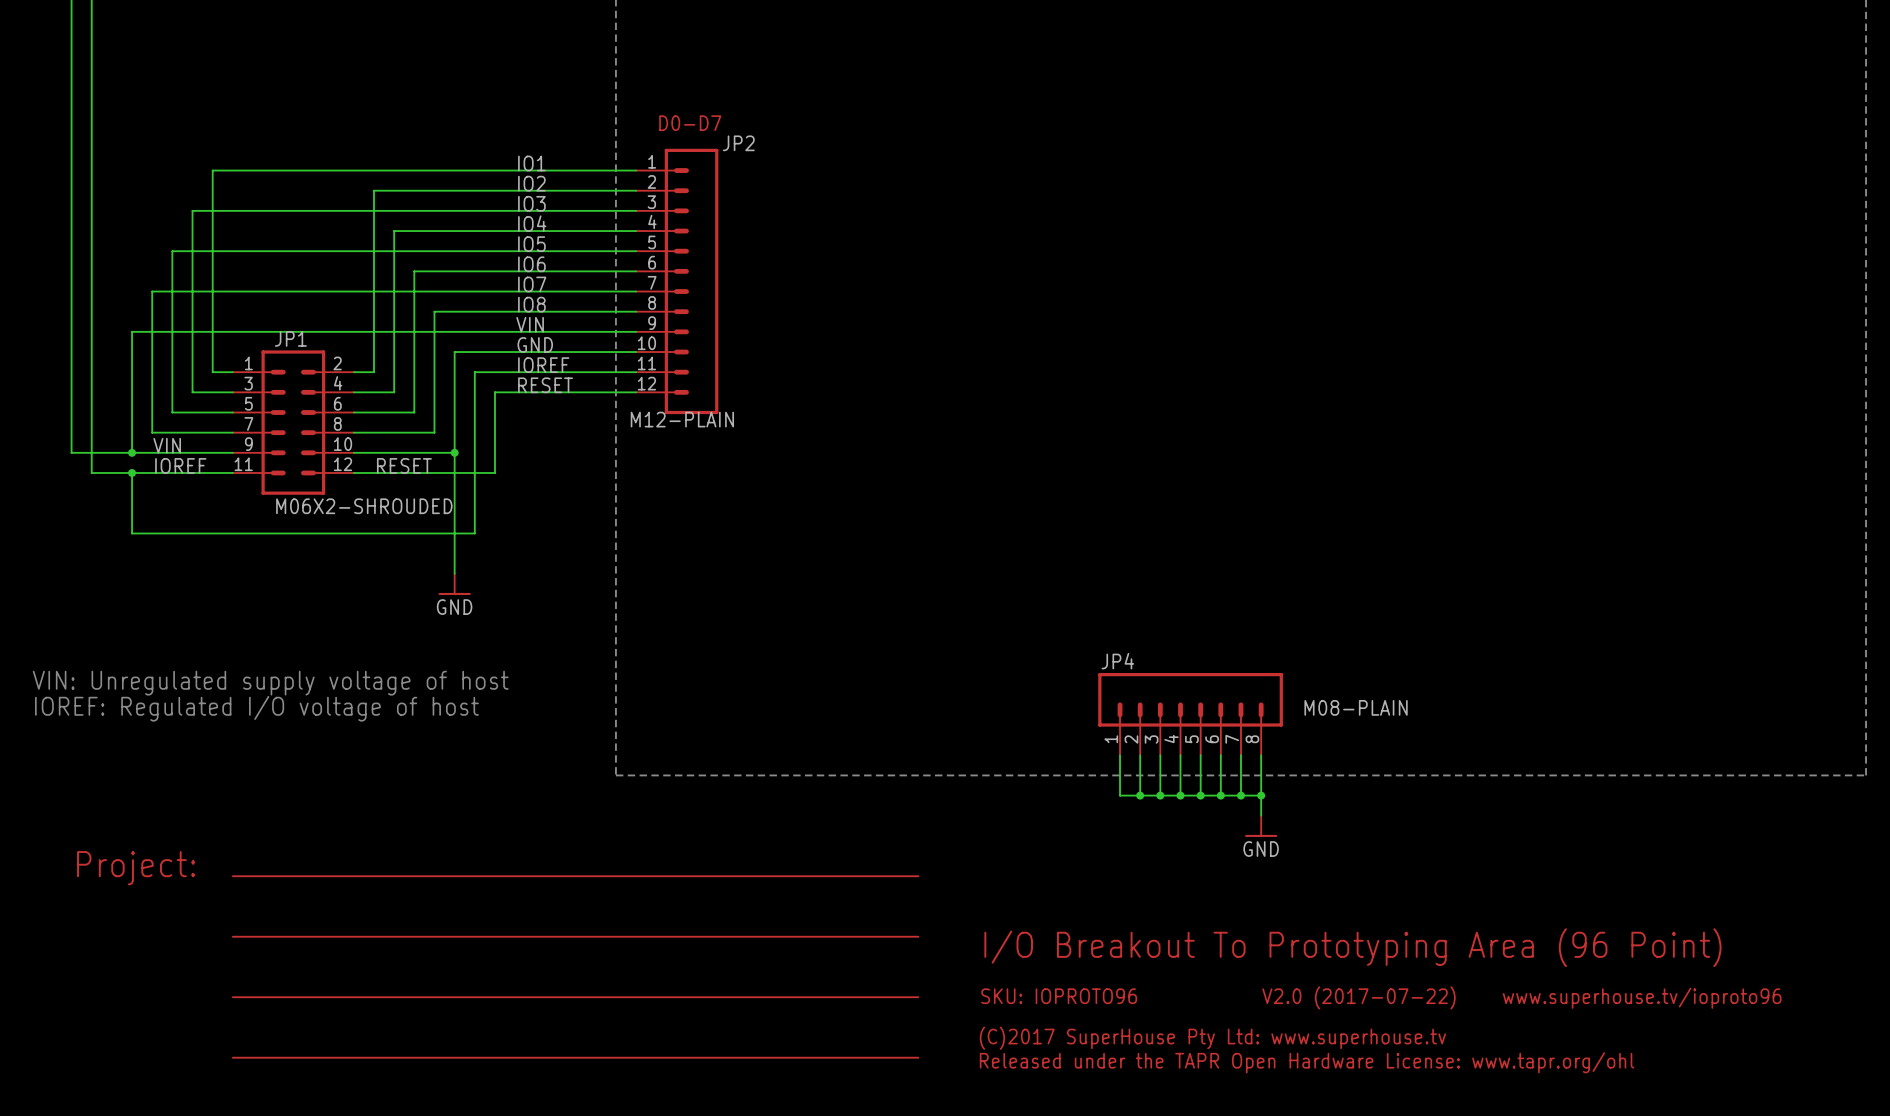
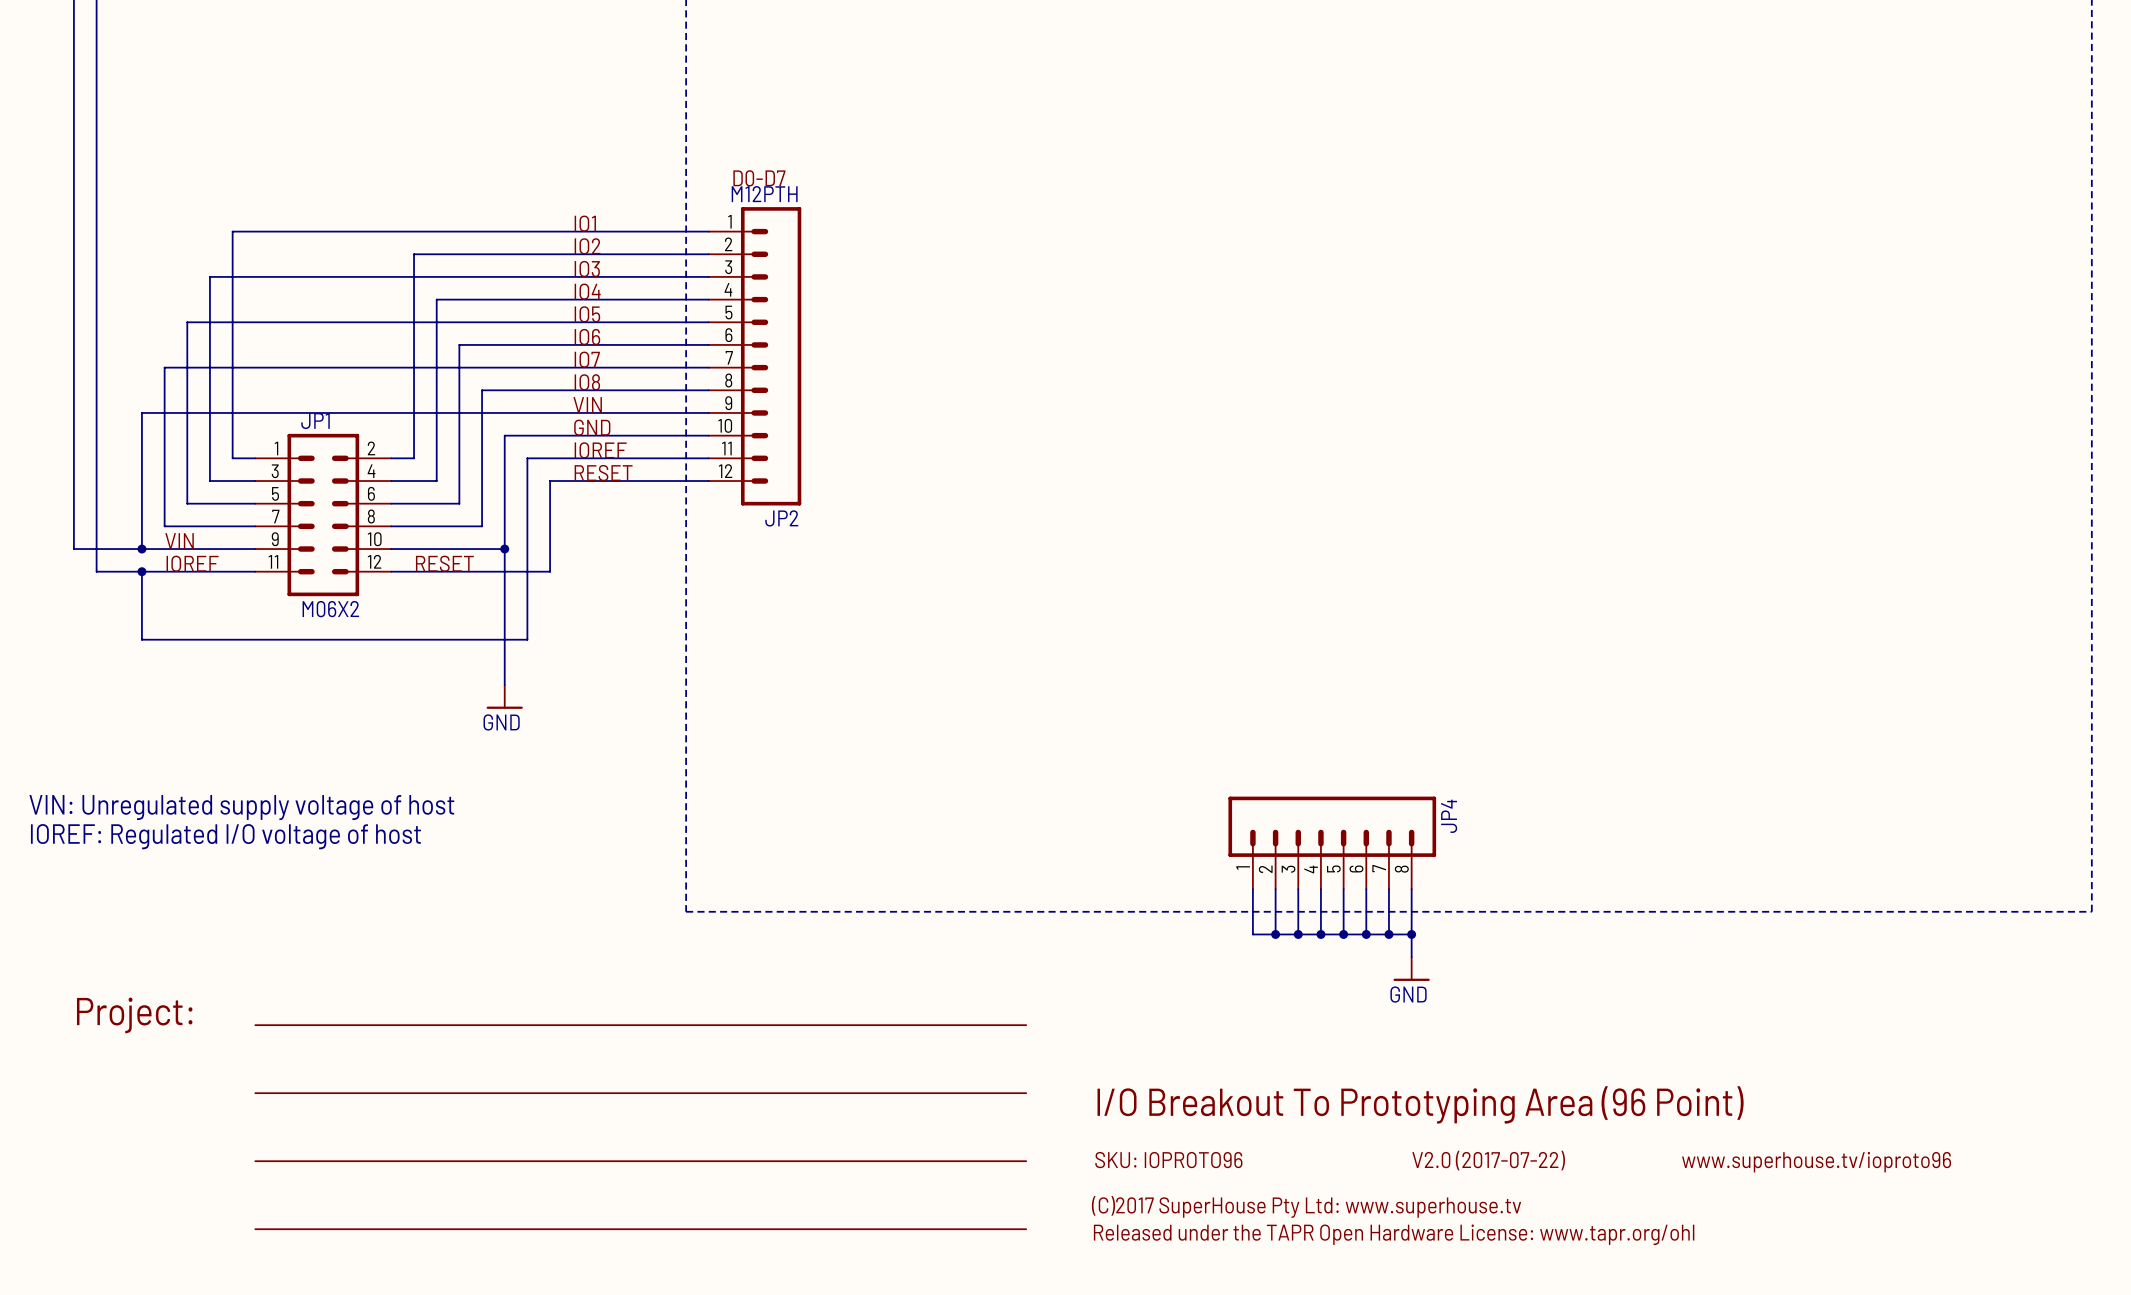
JP2 name position: JP2 (738, 143) -> JP2 (781, 518)
JP2 value: M12-PLAIN (682, 419) -> M12PTH (764, 194)
JP1 value: M06X2-SHROUDED (364, 506) -> M06X2 (330, 609)
JP4 name rotation: 0° (1117, 661) -> 90° counterclockwise (1449, 816)
JP4 name position: JP4 (1117, 661) -> JP4 (1449, 816)
JP4 value: M08-PLAIN (1356, 707) -> none

